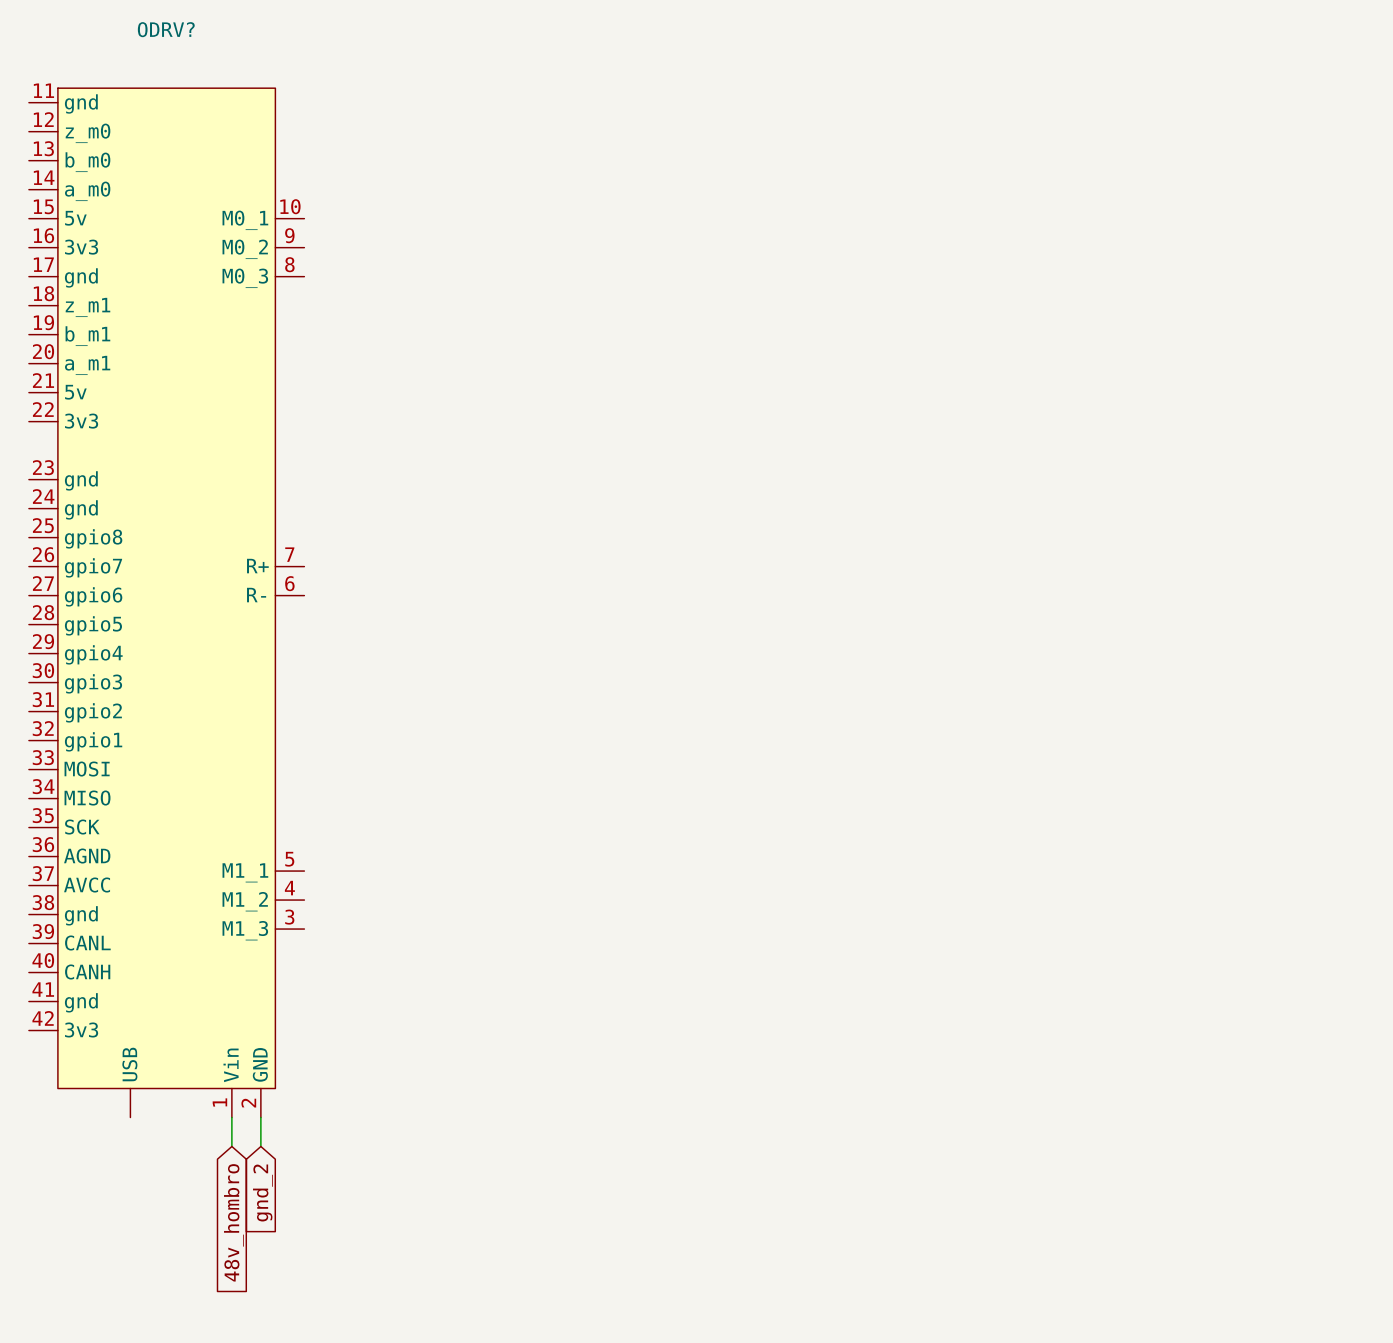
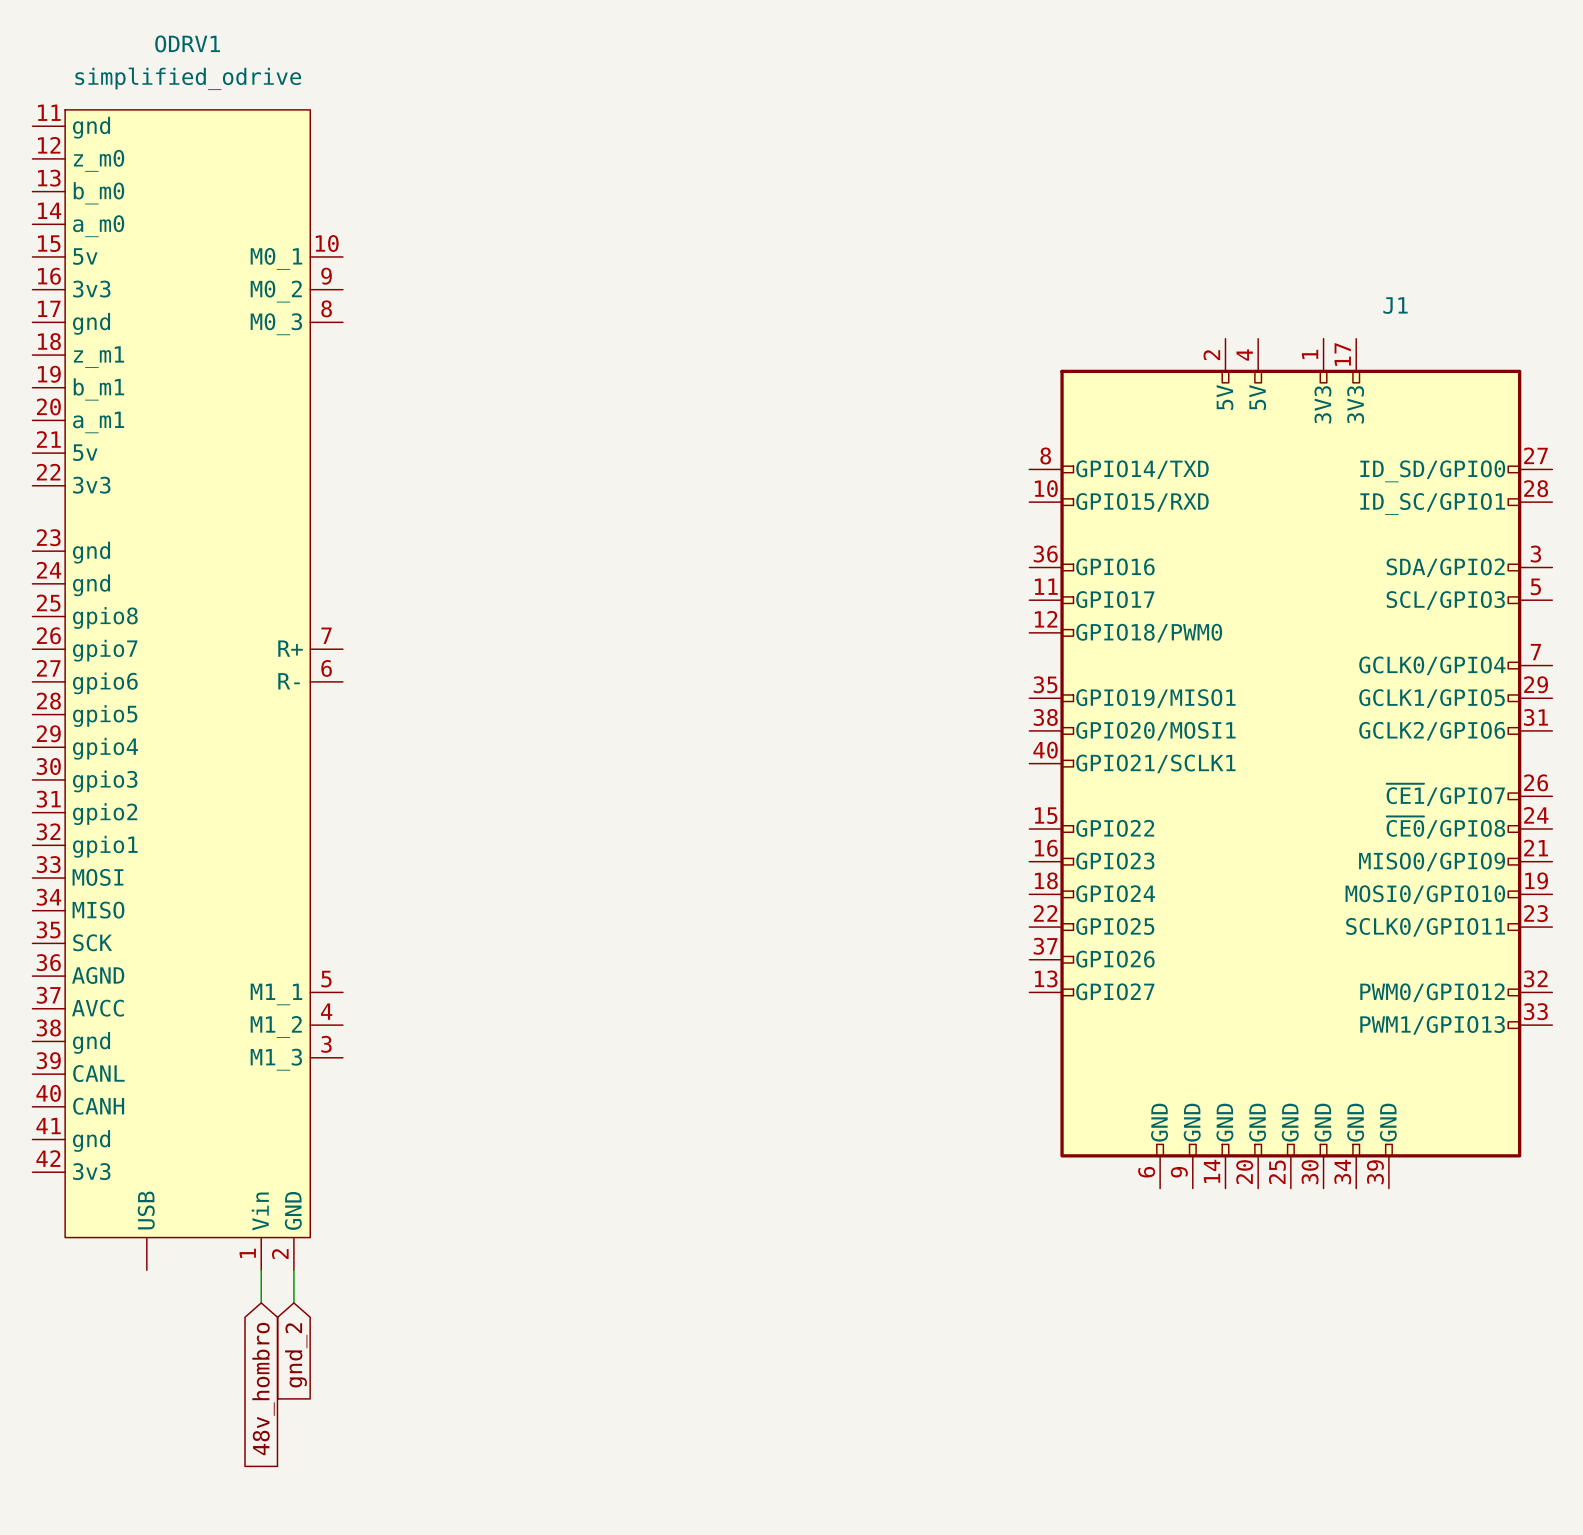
ODRV? name: ODRV? (166, 29) -> ODRV1 (187, 43)
ODRV? value: none -> simplified_odrive (188, 78)
J1: none -> (1290, 763)

